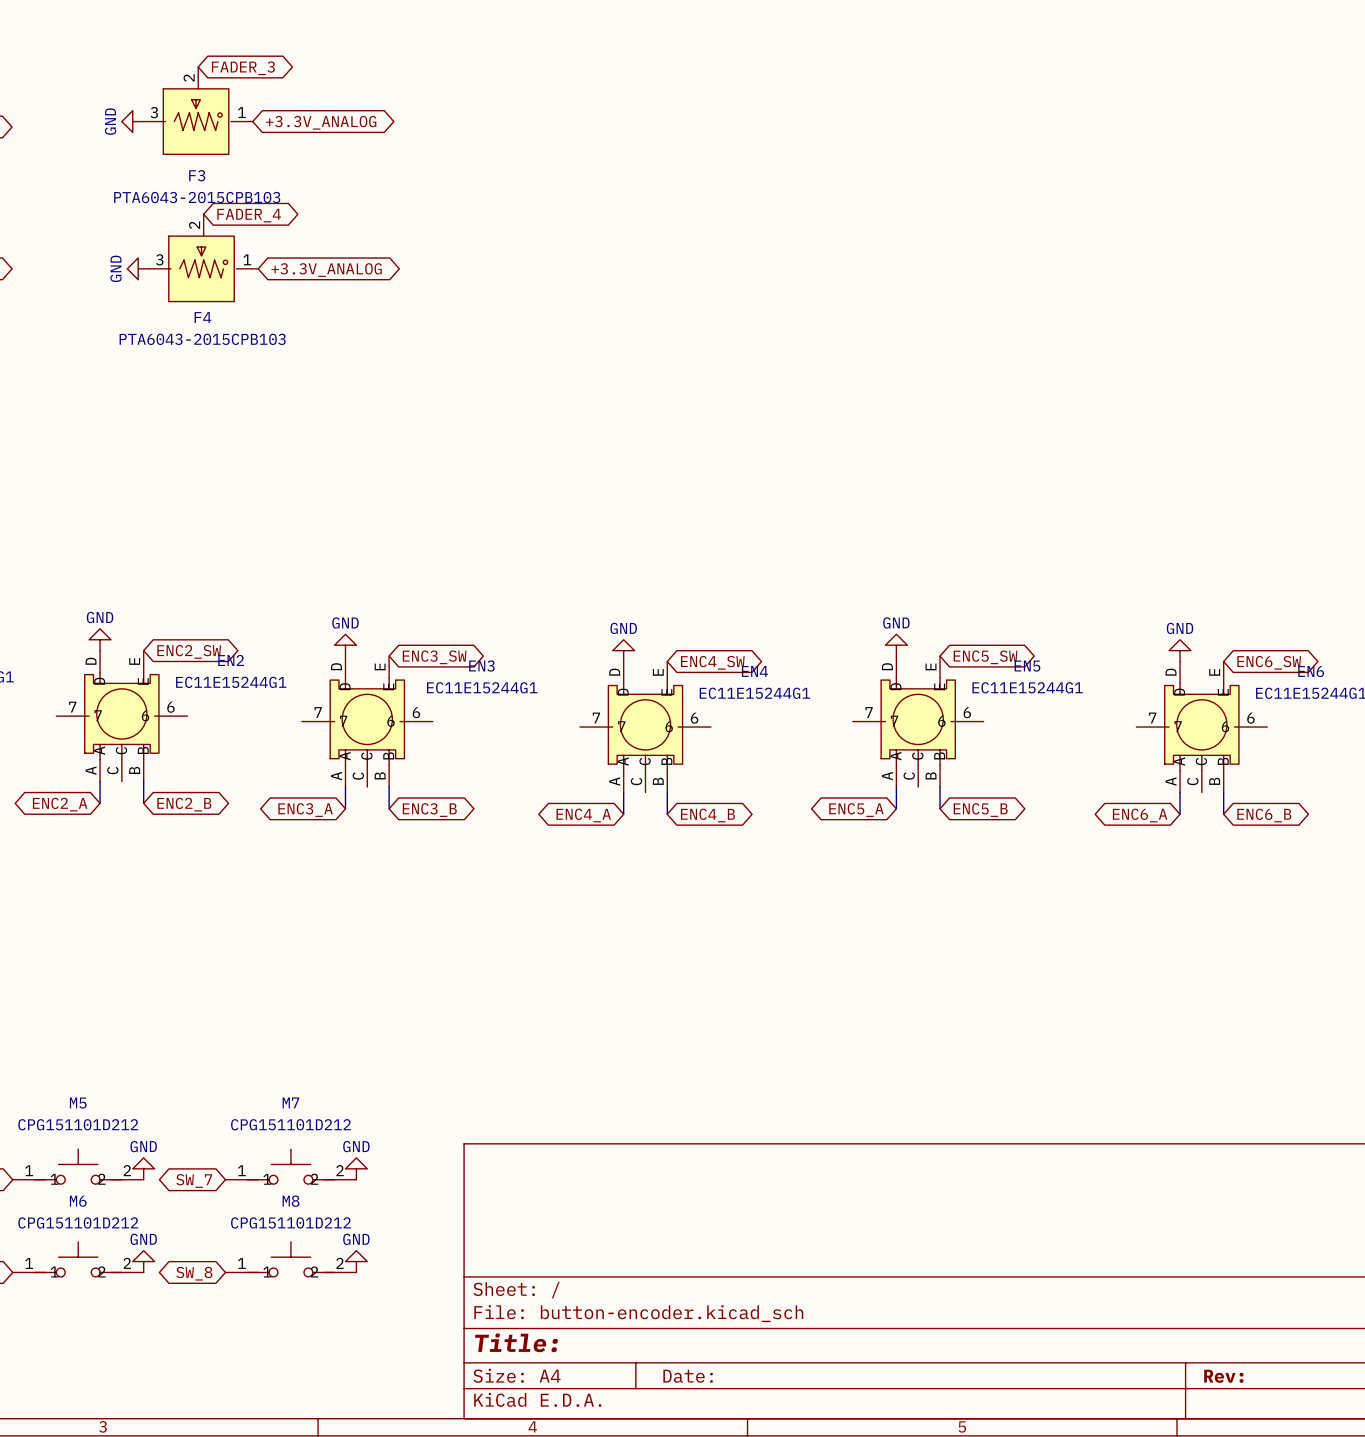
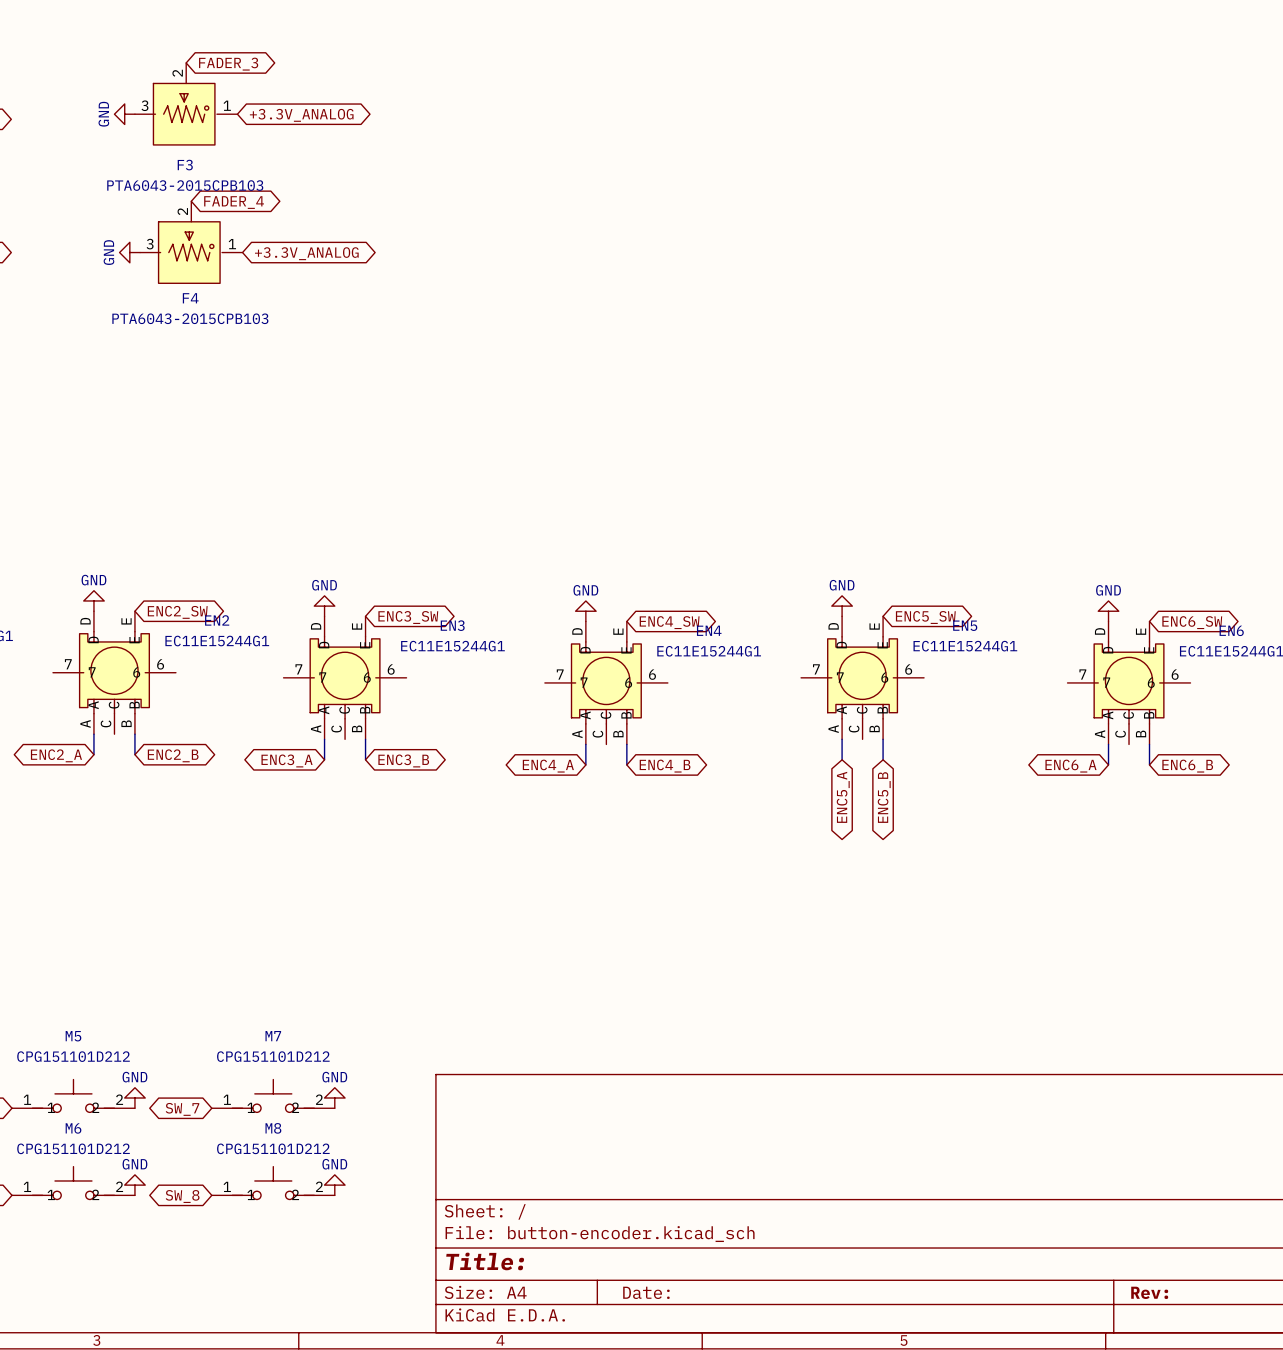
global label rotation: 0° (856, 810) -> 90° counterclockwise (843, 797)
global label rotation: 0° (980, 810) -> 90° clockwise (884, 797)

